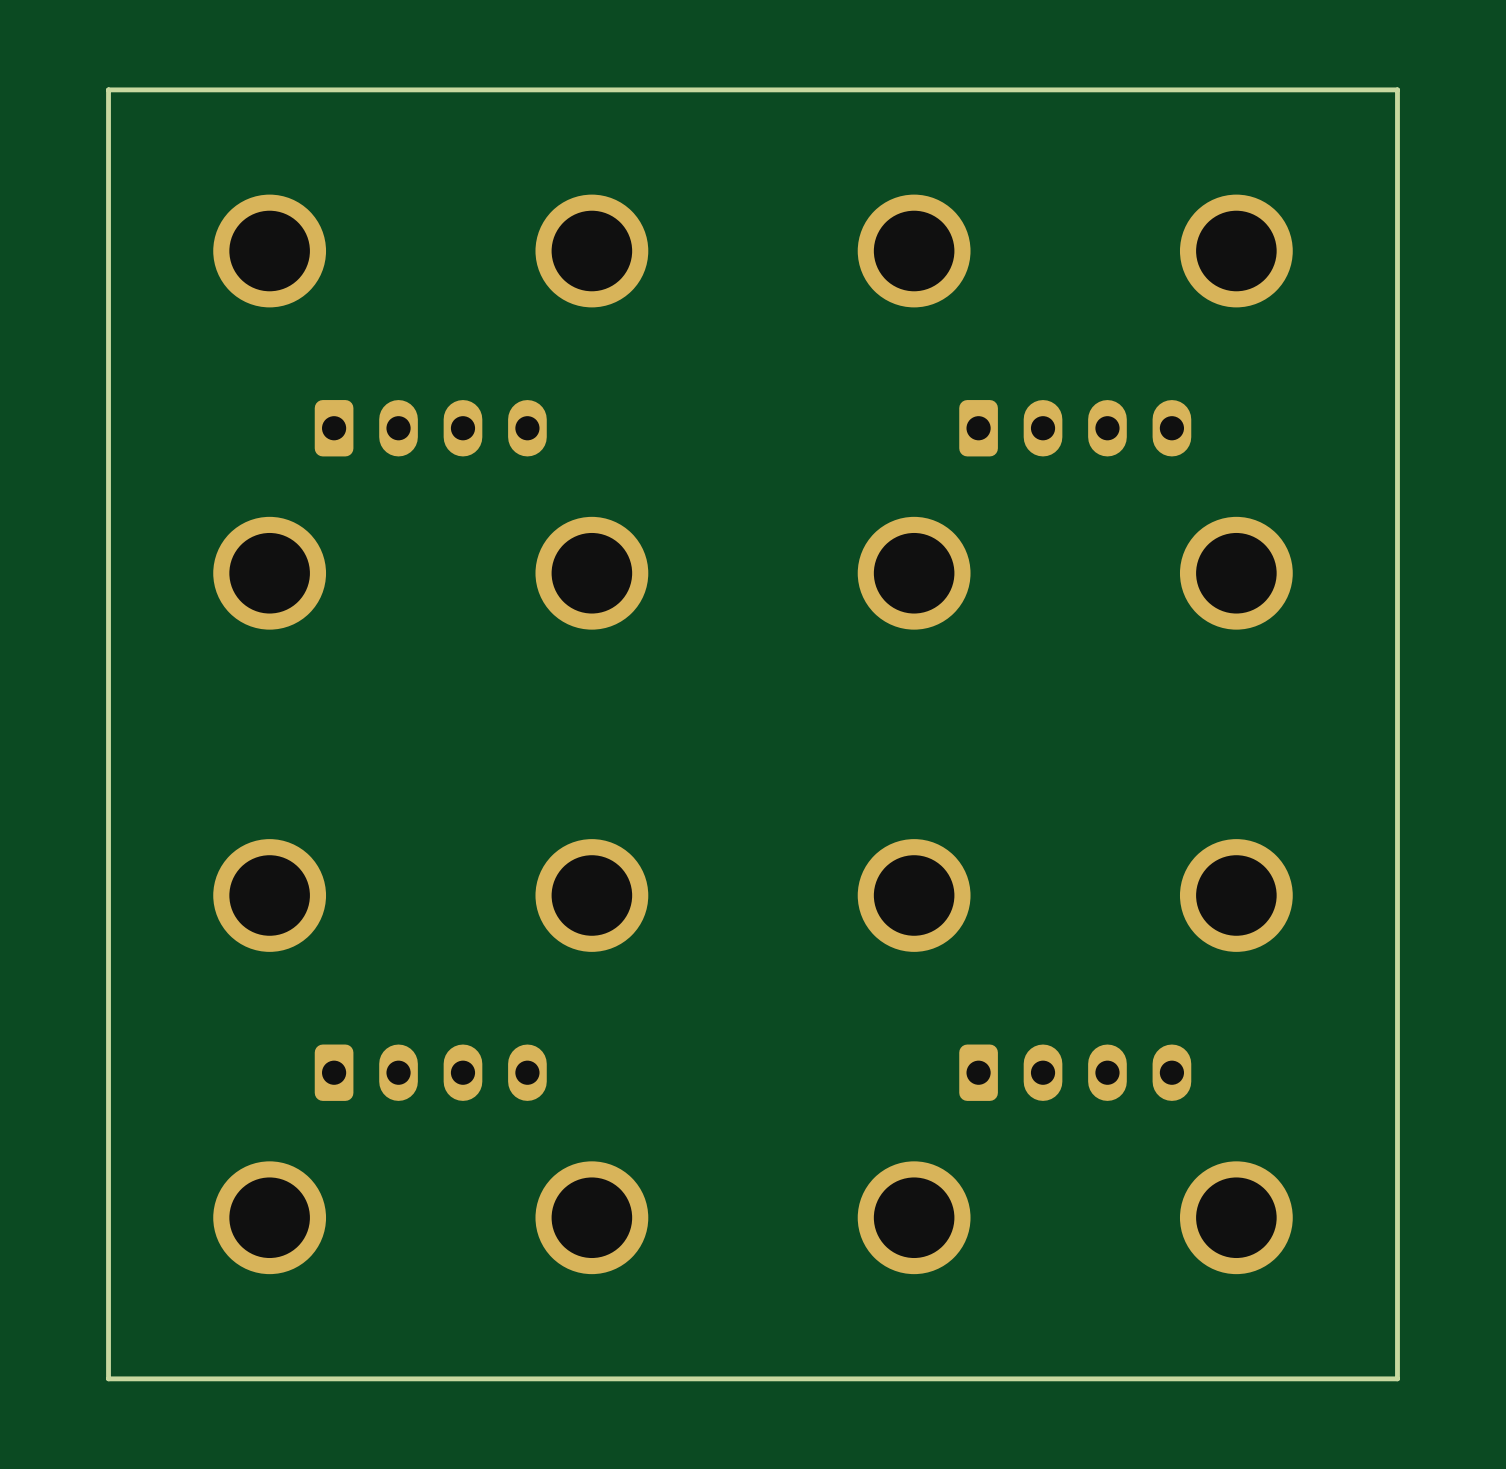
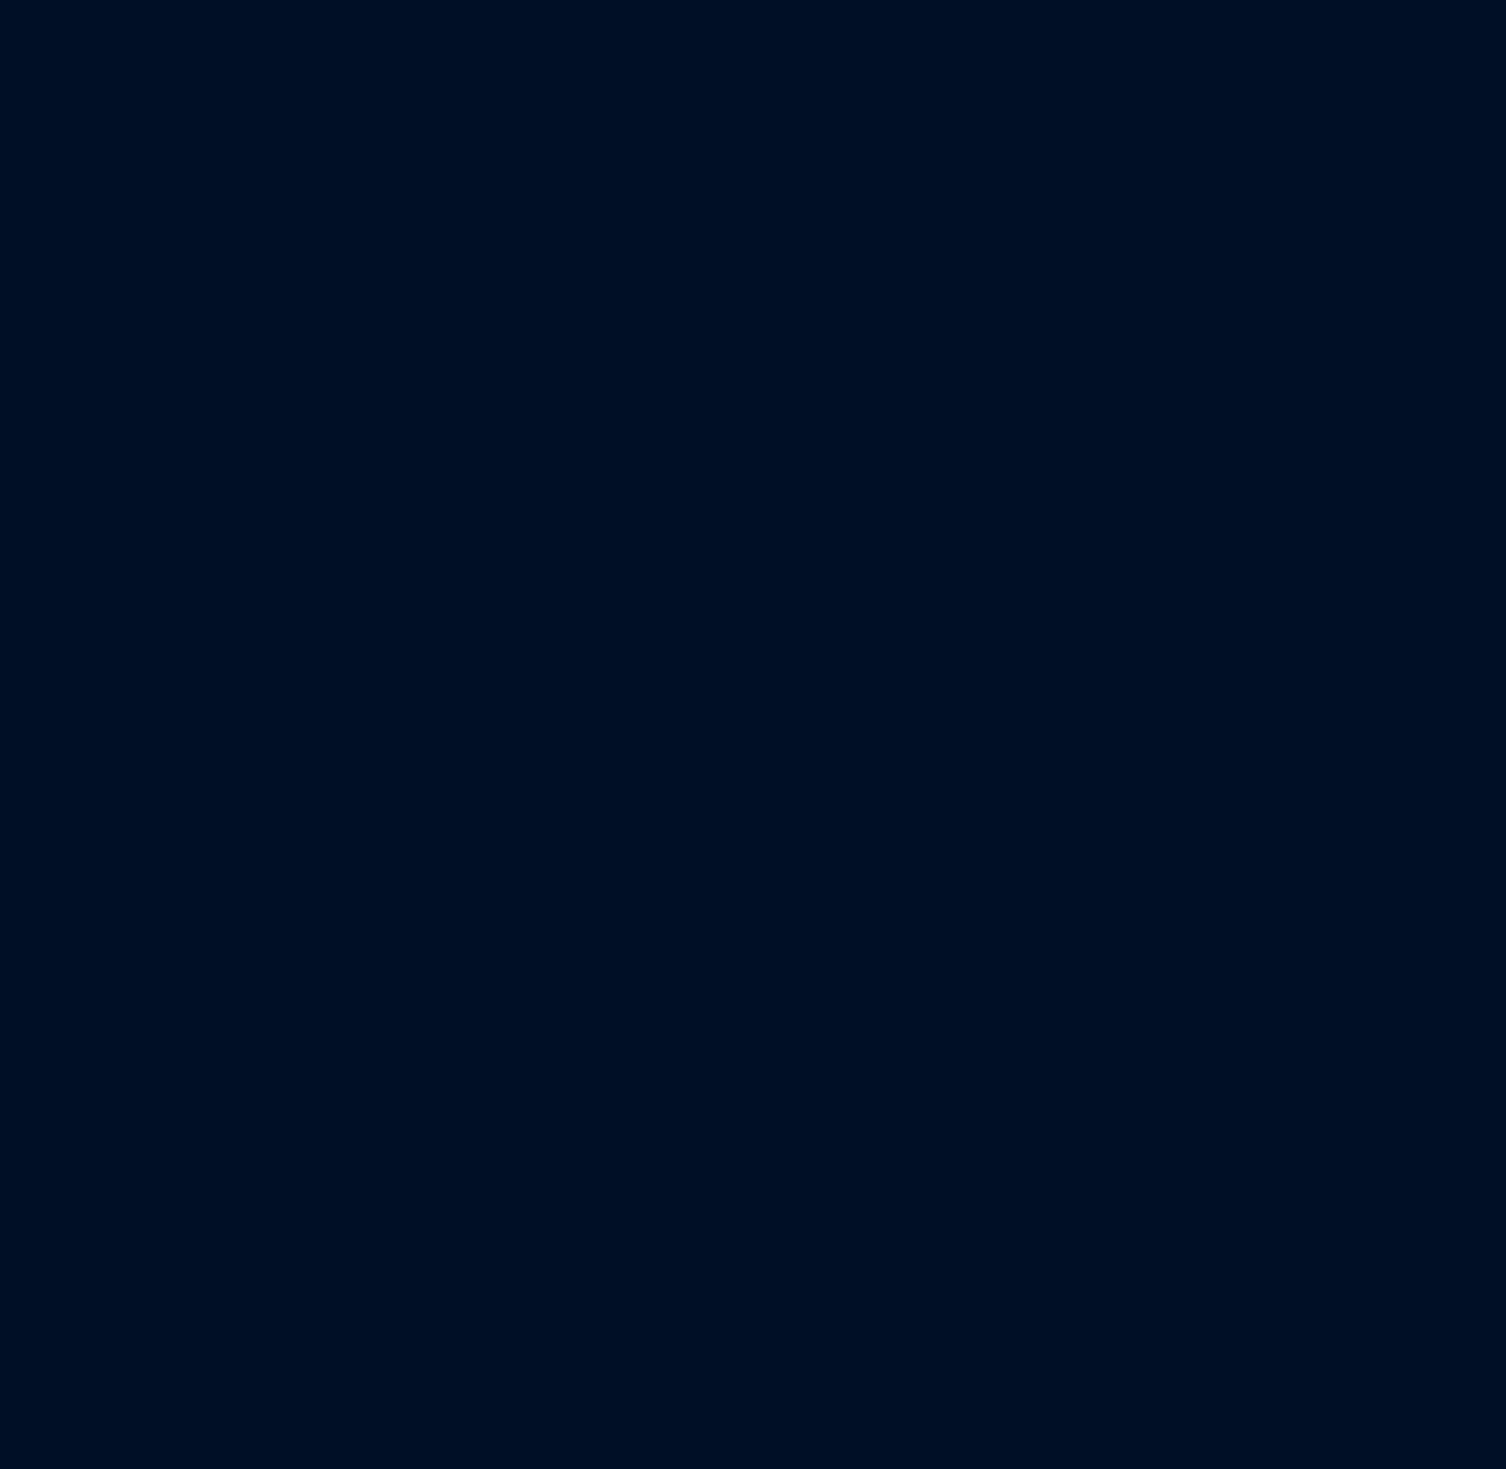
board edge: (1397, 89) (1397, 1378) (108, 1378) (108, 89) (1397, 89) -> none
part: (269, 251) -> none
part: (591, 251) -> none
part: (914, 251) -> none
part: (1236, 251) -> none
part: (430, 428) -> none
part: (1075, 428) -> none
part: (269, 573) -> none
part: (591, 573) -> none
part: (914, 573) -> none
part: (1236, 573) -> none
part: (269, 895) -> none
part: (591, 895) -> none
part: (914, 895) -> none
part: (1236, 895) -> none
part: (430, 1072) -> none
part: (1075, 1072) -> none
part: (269, 1217) -> none
part: (591, 1217) -> none
part: (914, 1217) -> none
part: (1236, 1217) -> none

